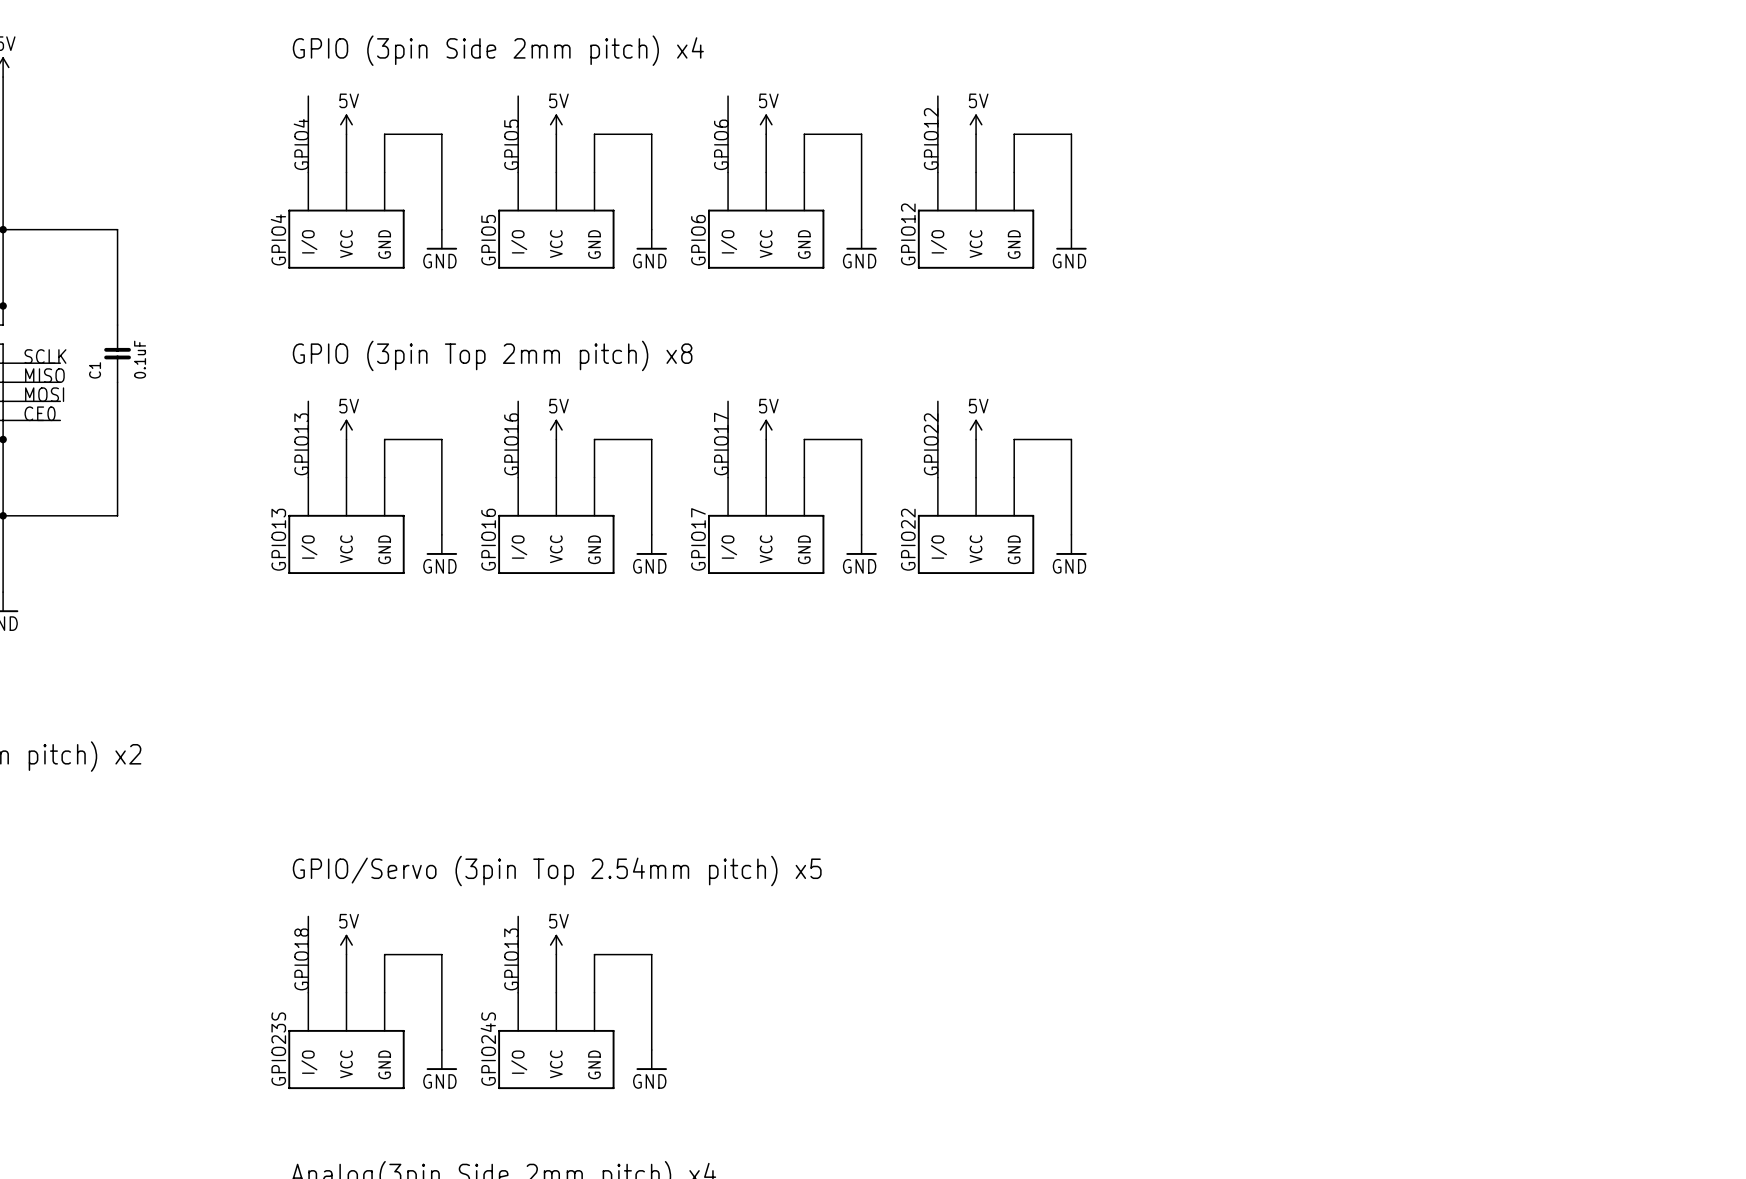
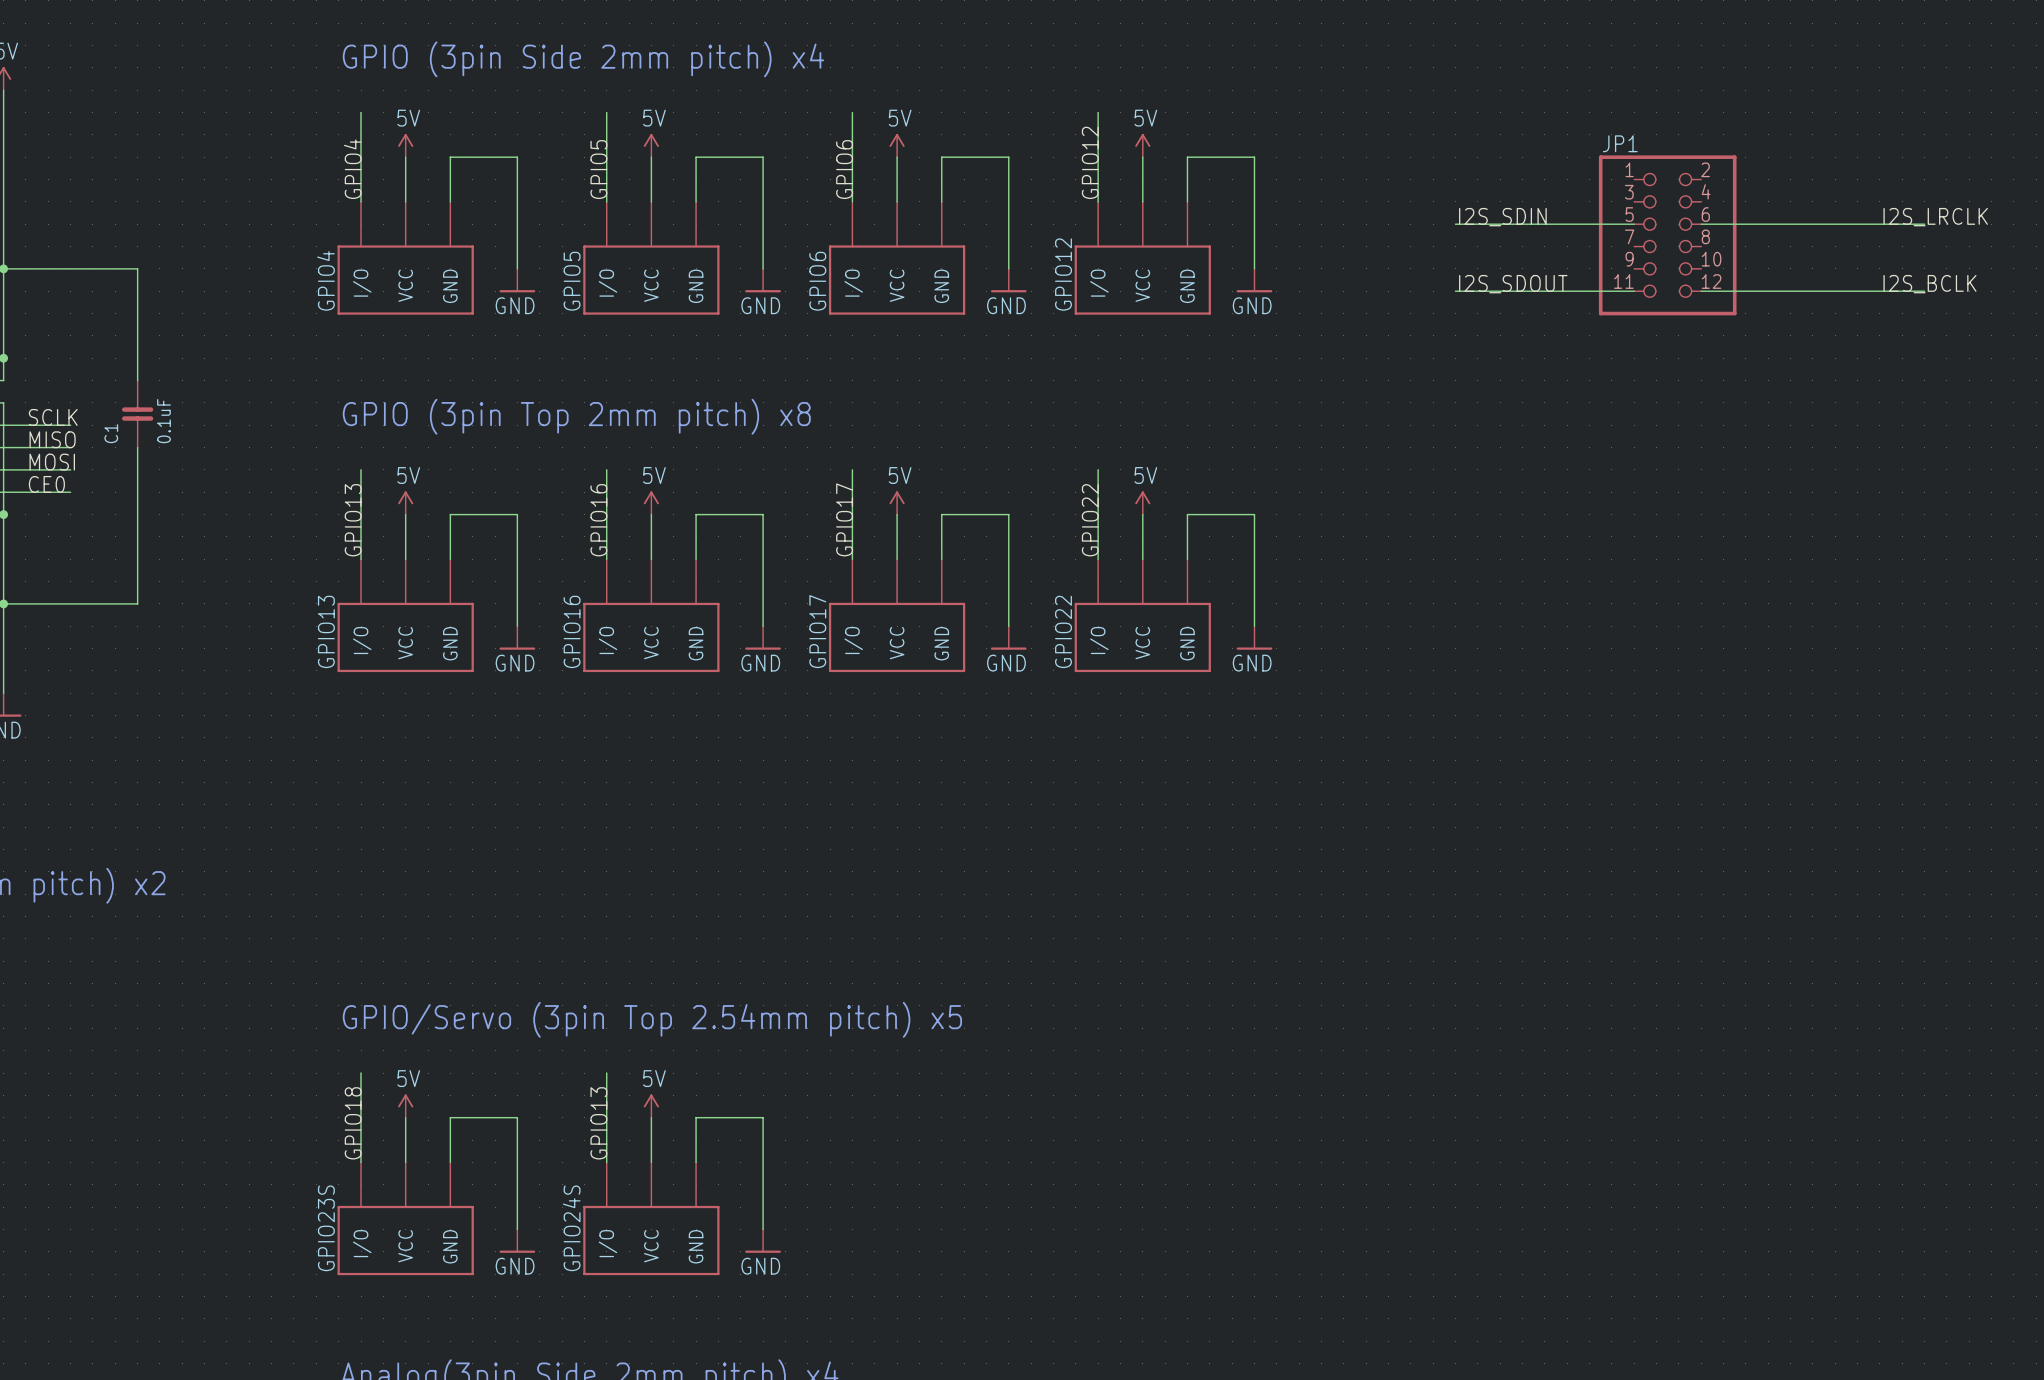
label: none -> I2S_SDIN (1502, 217)
label: none -> I2S_LRCLK (1935, 217)
wire: none -> (1455, 224) (1634, 224)
wire: none -> (1701, 224) (1924, 224)
JP1: none -> (1667, 235)
label: none -> I2S_SDOUT (1513, 284)
label: none -> I2S_BCLK (1929, 284)
wire: none -> (1455, 291) (1634, 291)
wire: none -> (1701, 291) (1924, 291)

